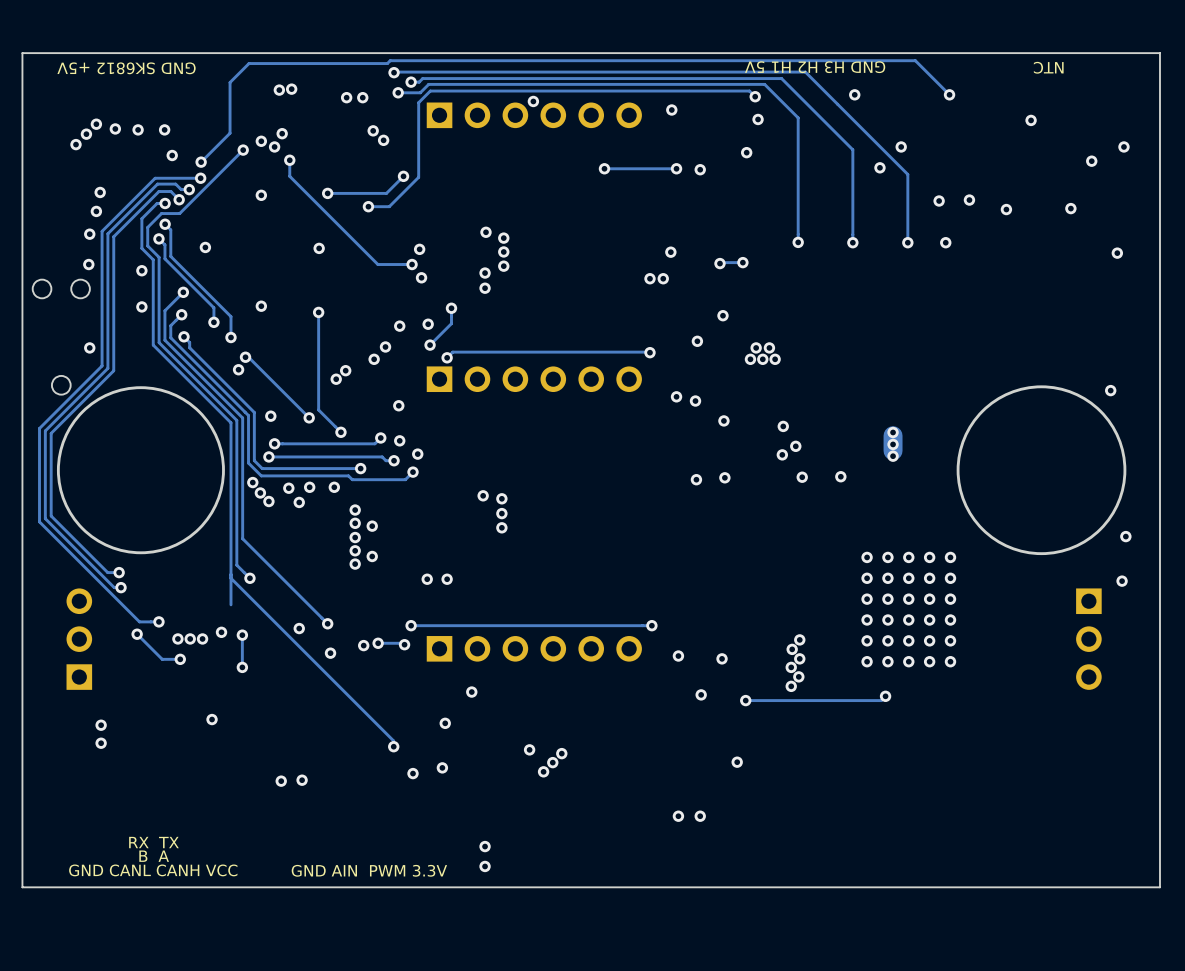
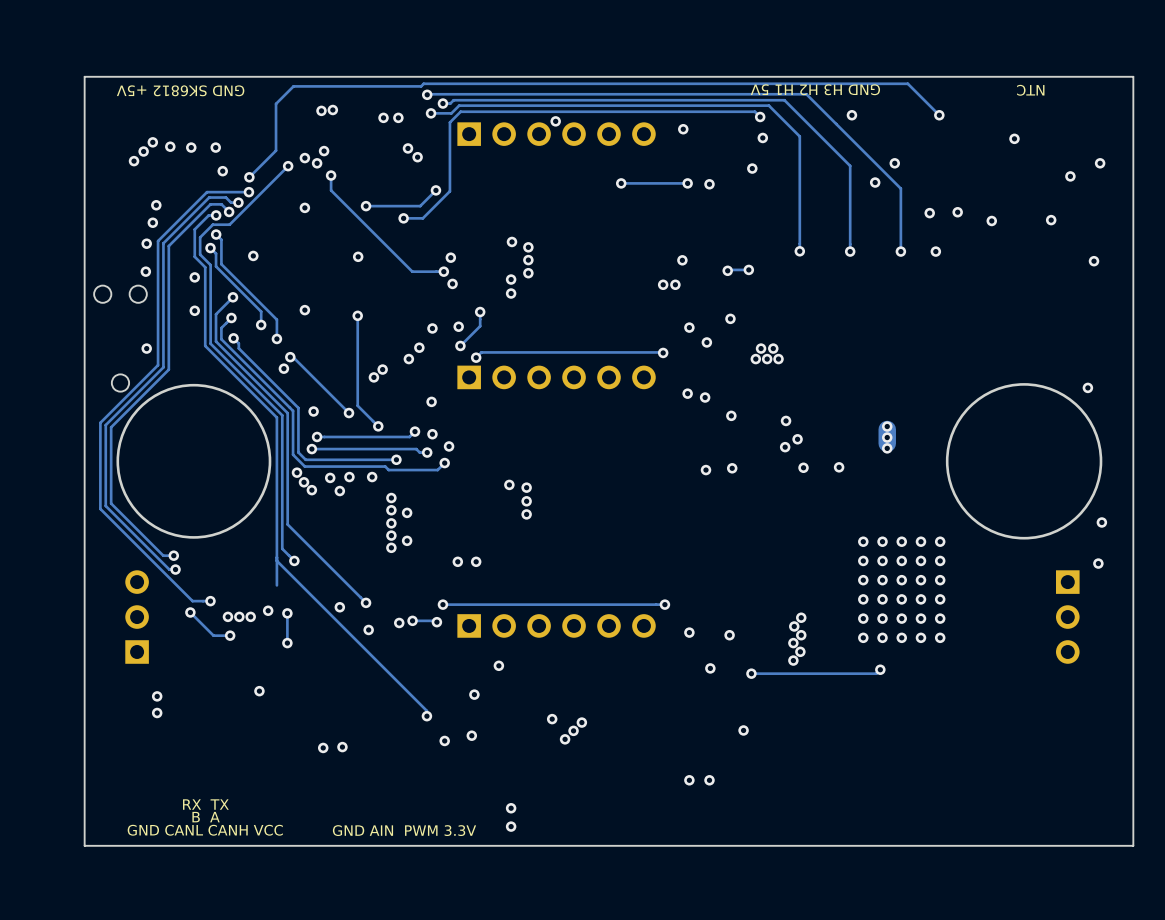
via: none -> (689, 327)

